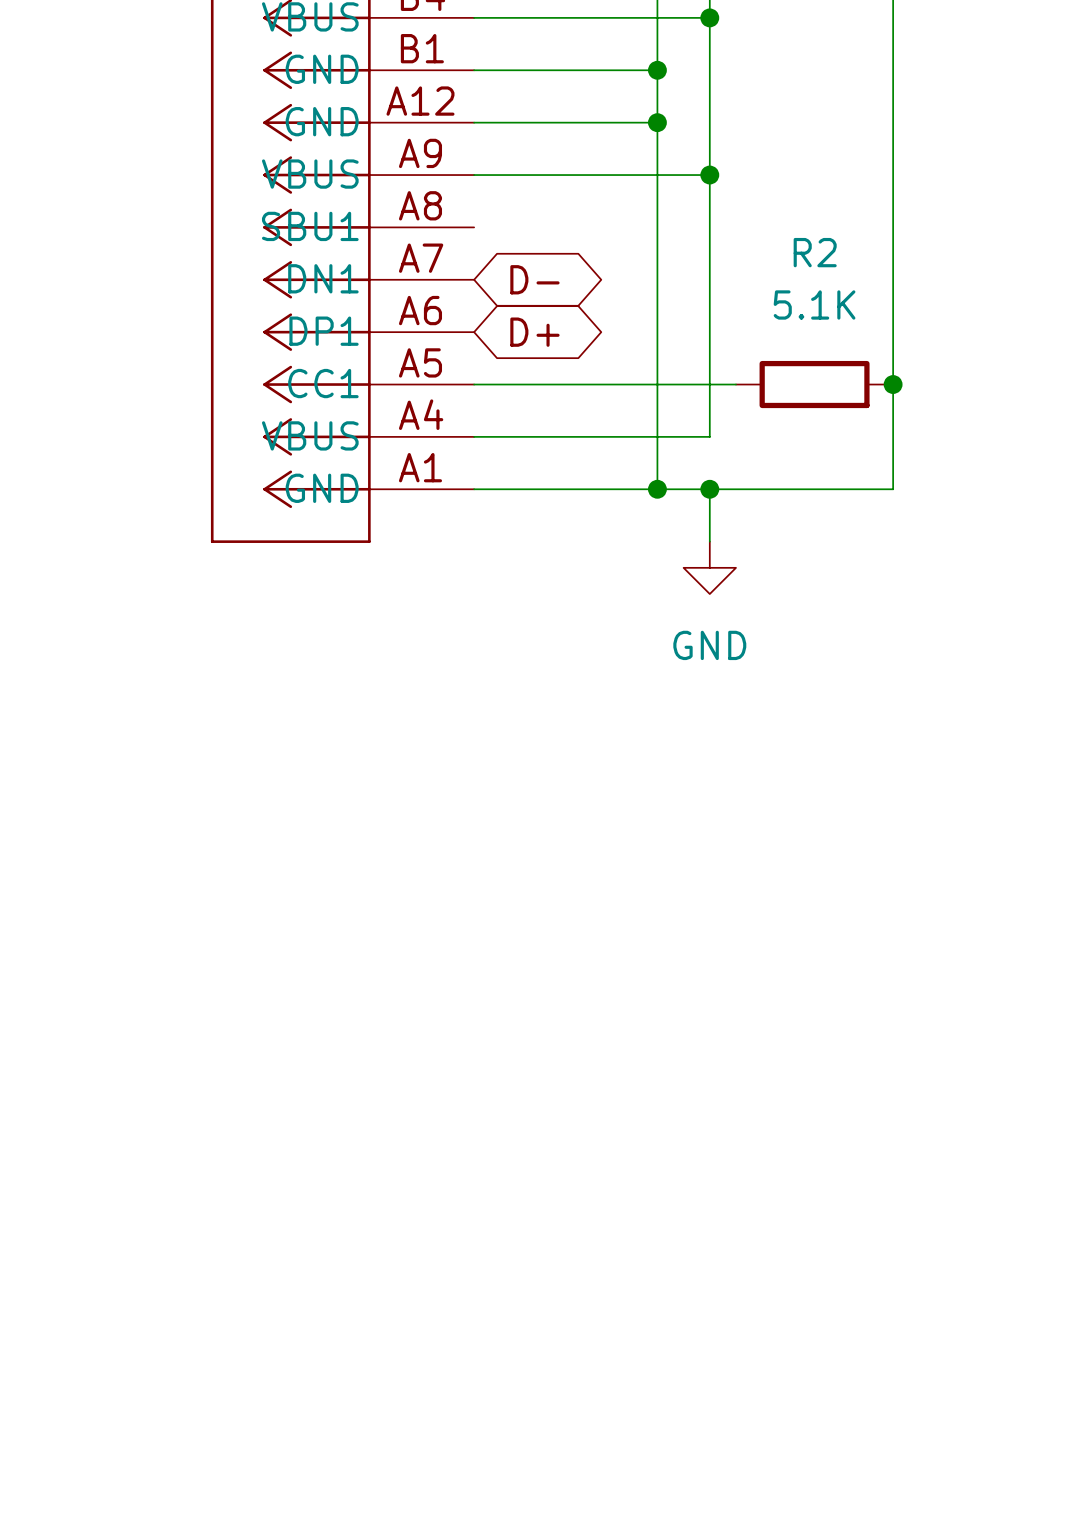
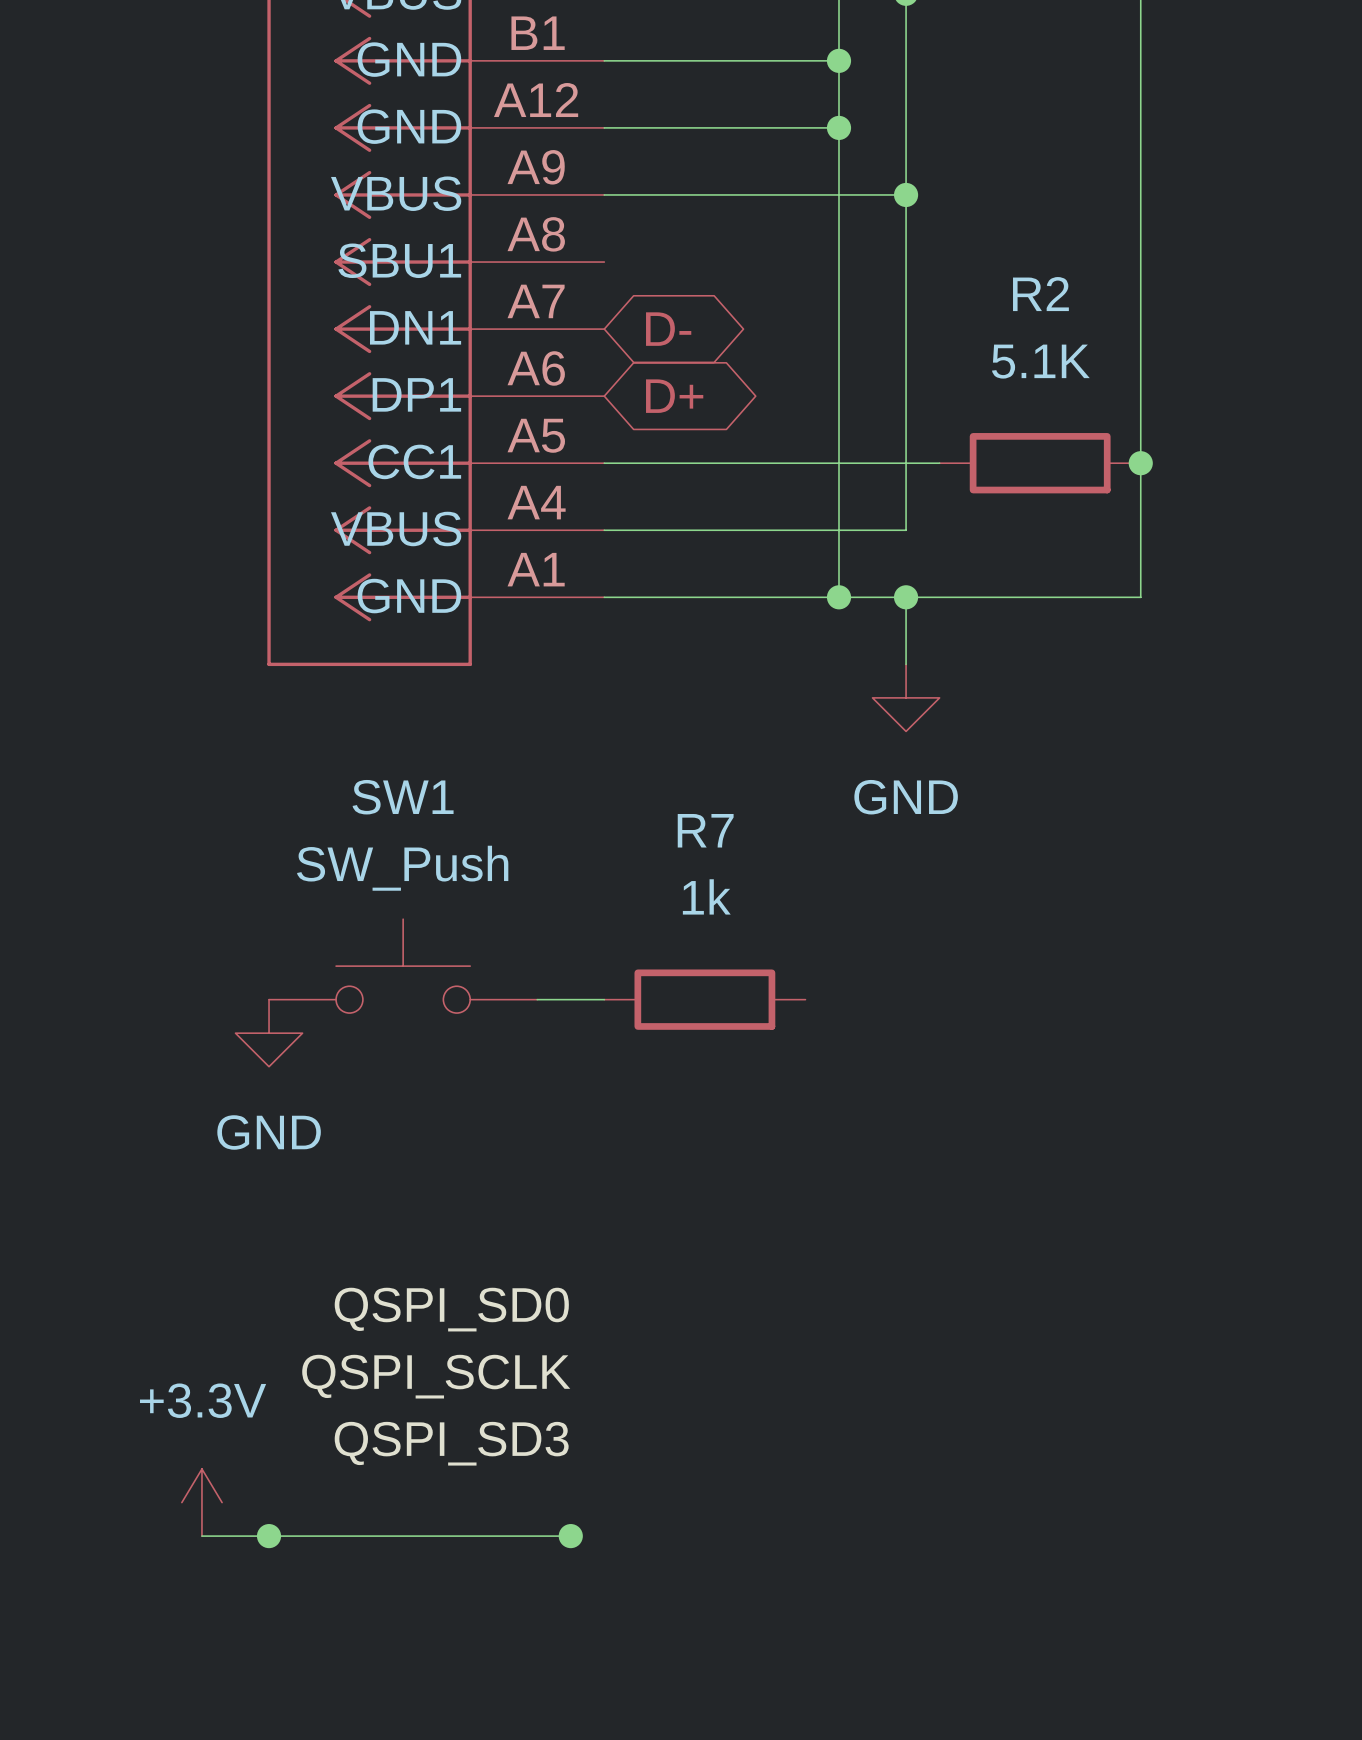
SW1: none -> SW_Push (403, 966)
wire: none -> (537, 999) (604, 999)
R7: none -> 1k (704, 999)
power symbol: none -> GND (269, 1033)
label: none -> QSPI_SD0 (451, 1309)
label: none -> QSPI_SCLK (436, 1376)
label: none -> QSPI_SD3 (451, 1443)
power symbol: none -> +3.3V (201, 1502)
wire: none -> (201, 1536) (570, 1536)
junction: none -> (269, 1536)
junction: none -> (570, 1536)

